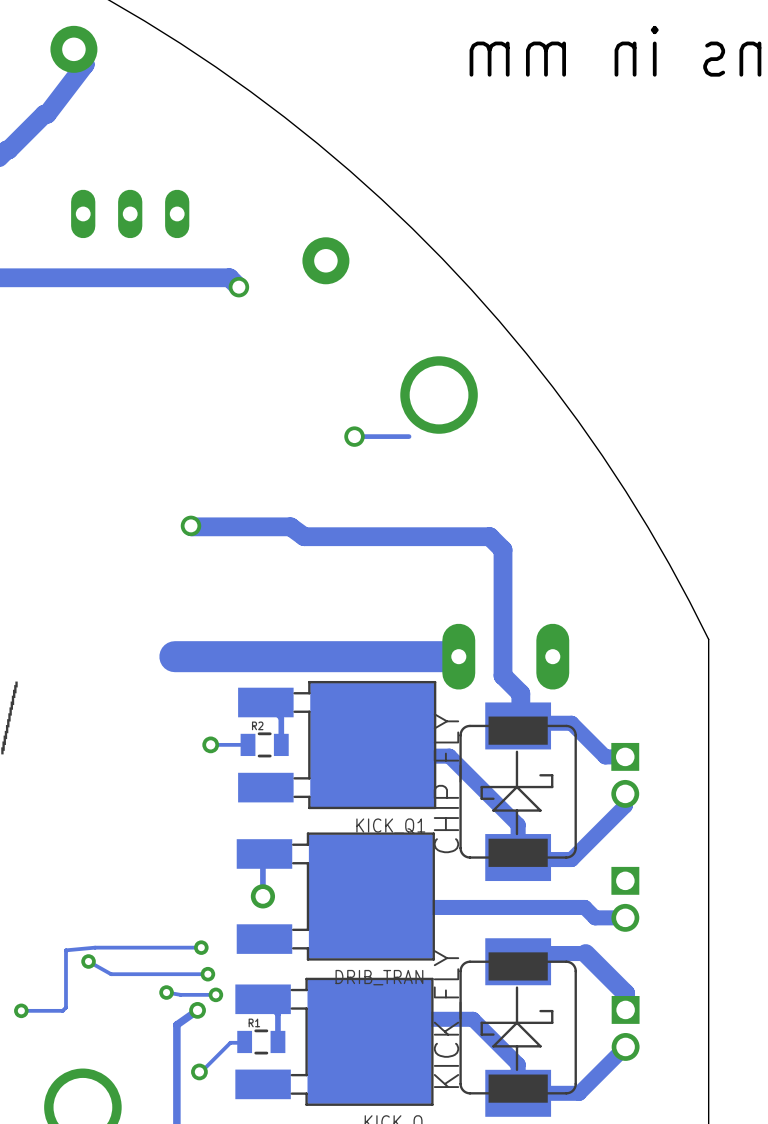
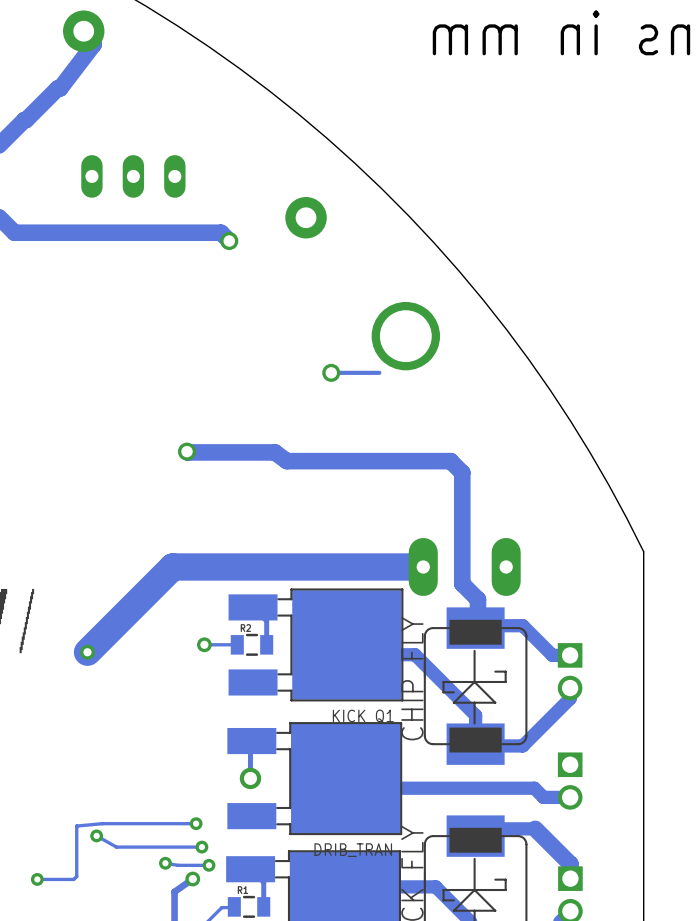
track: none -> (172, 566) (87, 652)
via: none -> (87, 652)

